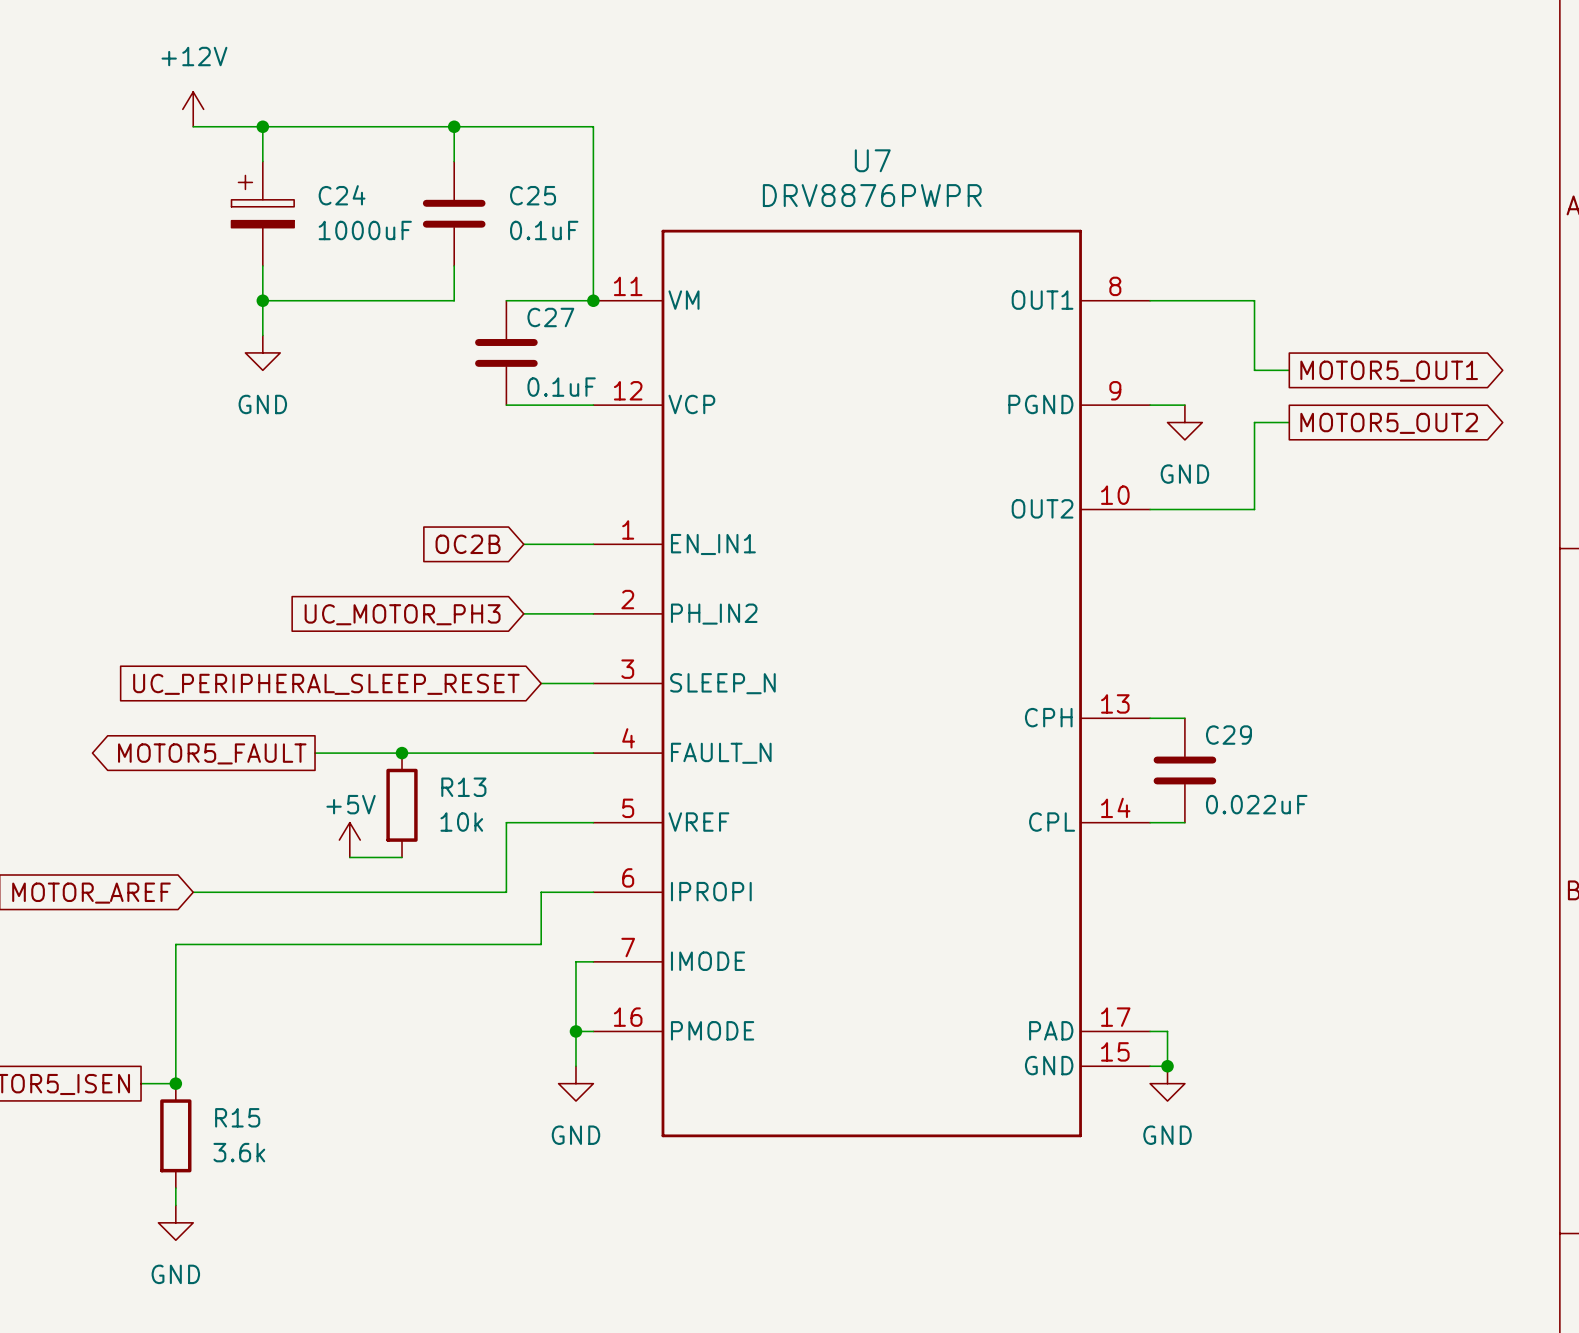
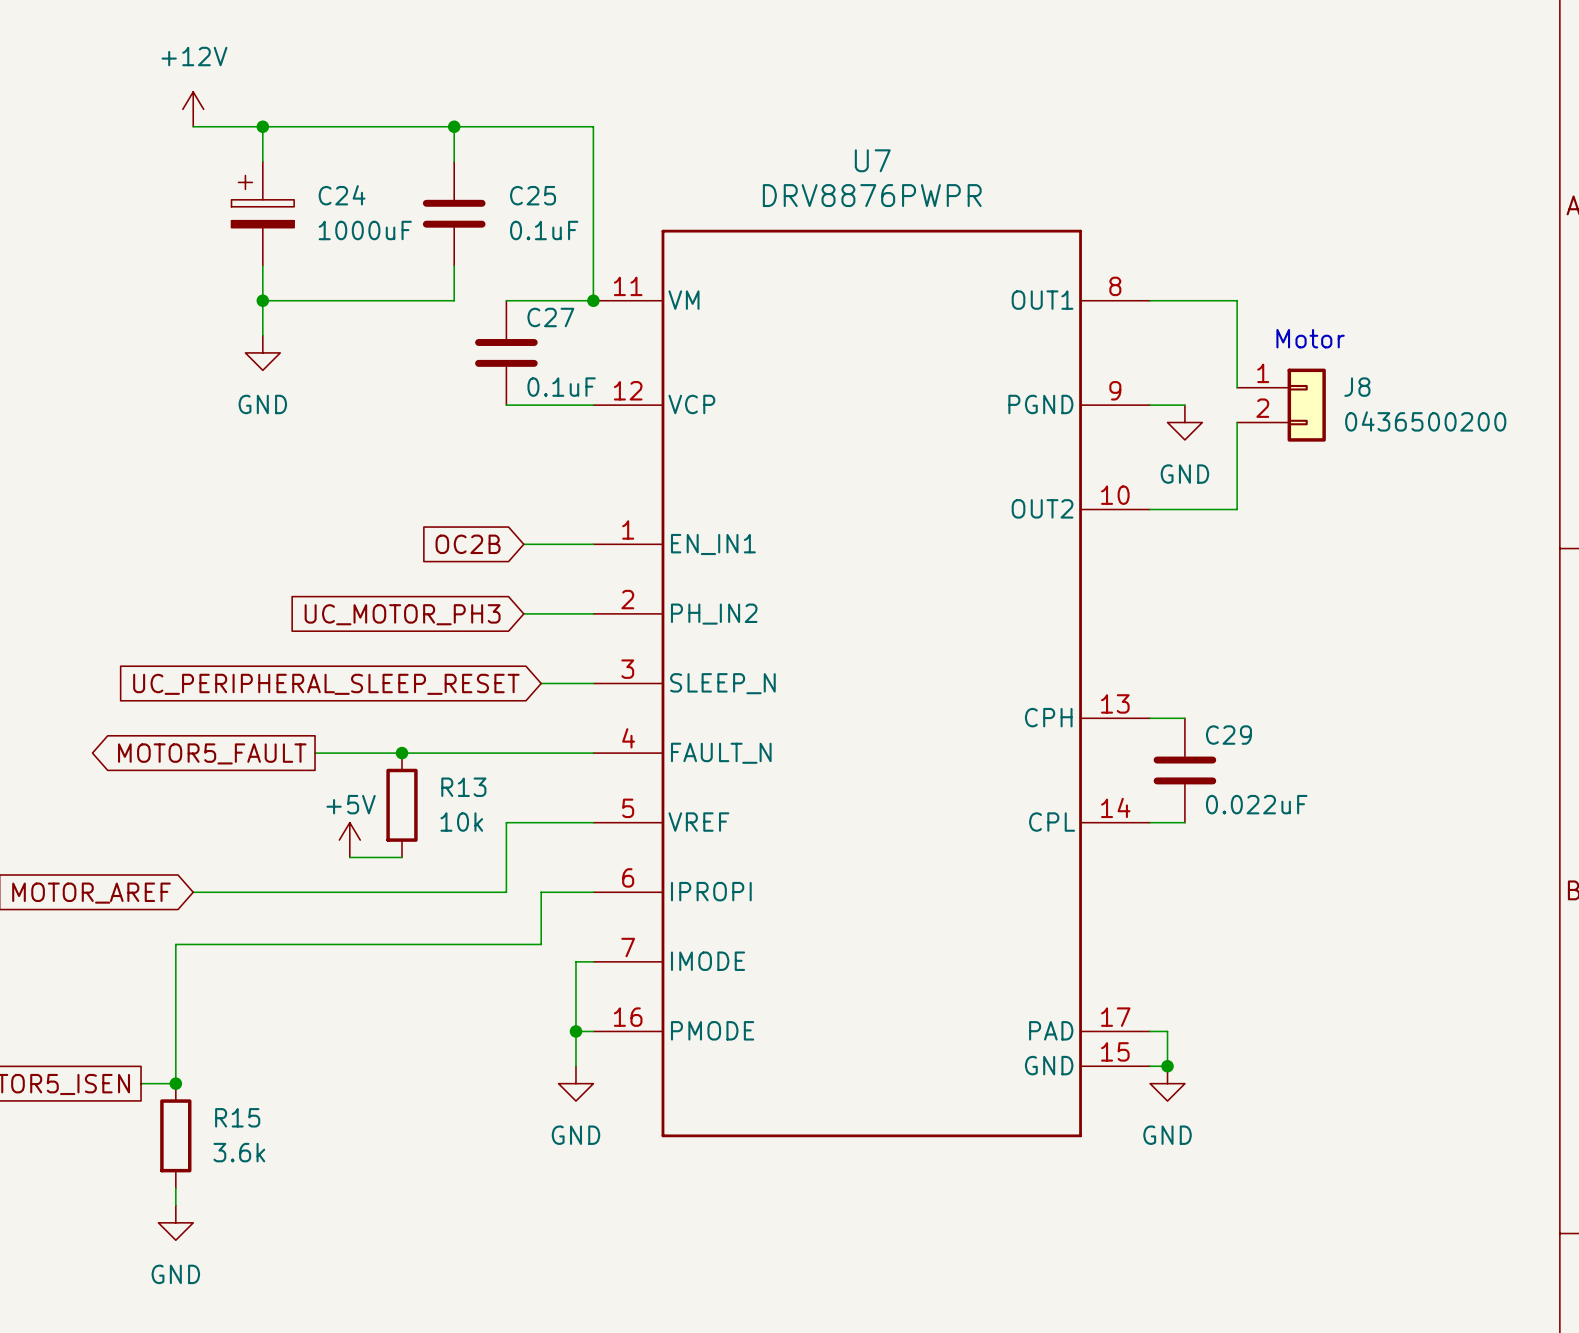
wire: (1237, 300) (1254, 300) (1254, 370) (1289, 370) -> (1237, 300) (1237, 387)
text: none -> Motor (1310, 338)
global label: MOTOR5_OUT1 (1389, 371) -> none
J8: none -> 0436500200 (1281, 405)
wire: (1289, 422) (1254, 422) (1254, 509) (1237, 509) -> (1237, 422) (1237, 509)
global label: MOTOR5_OUT2 (1389, 423) -> none

